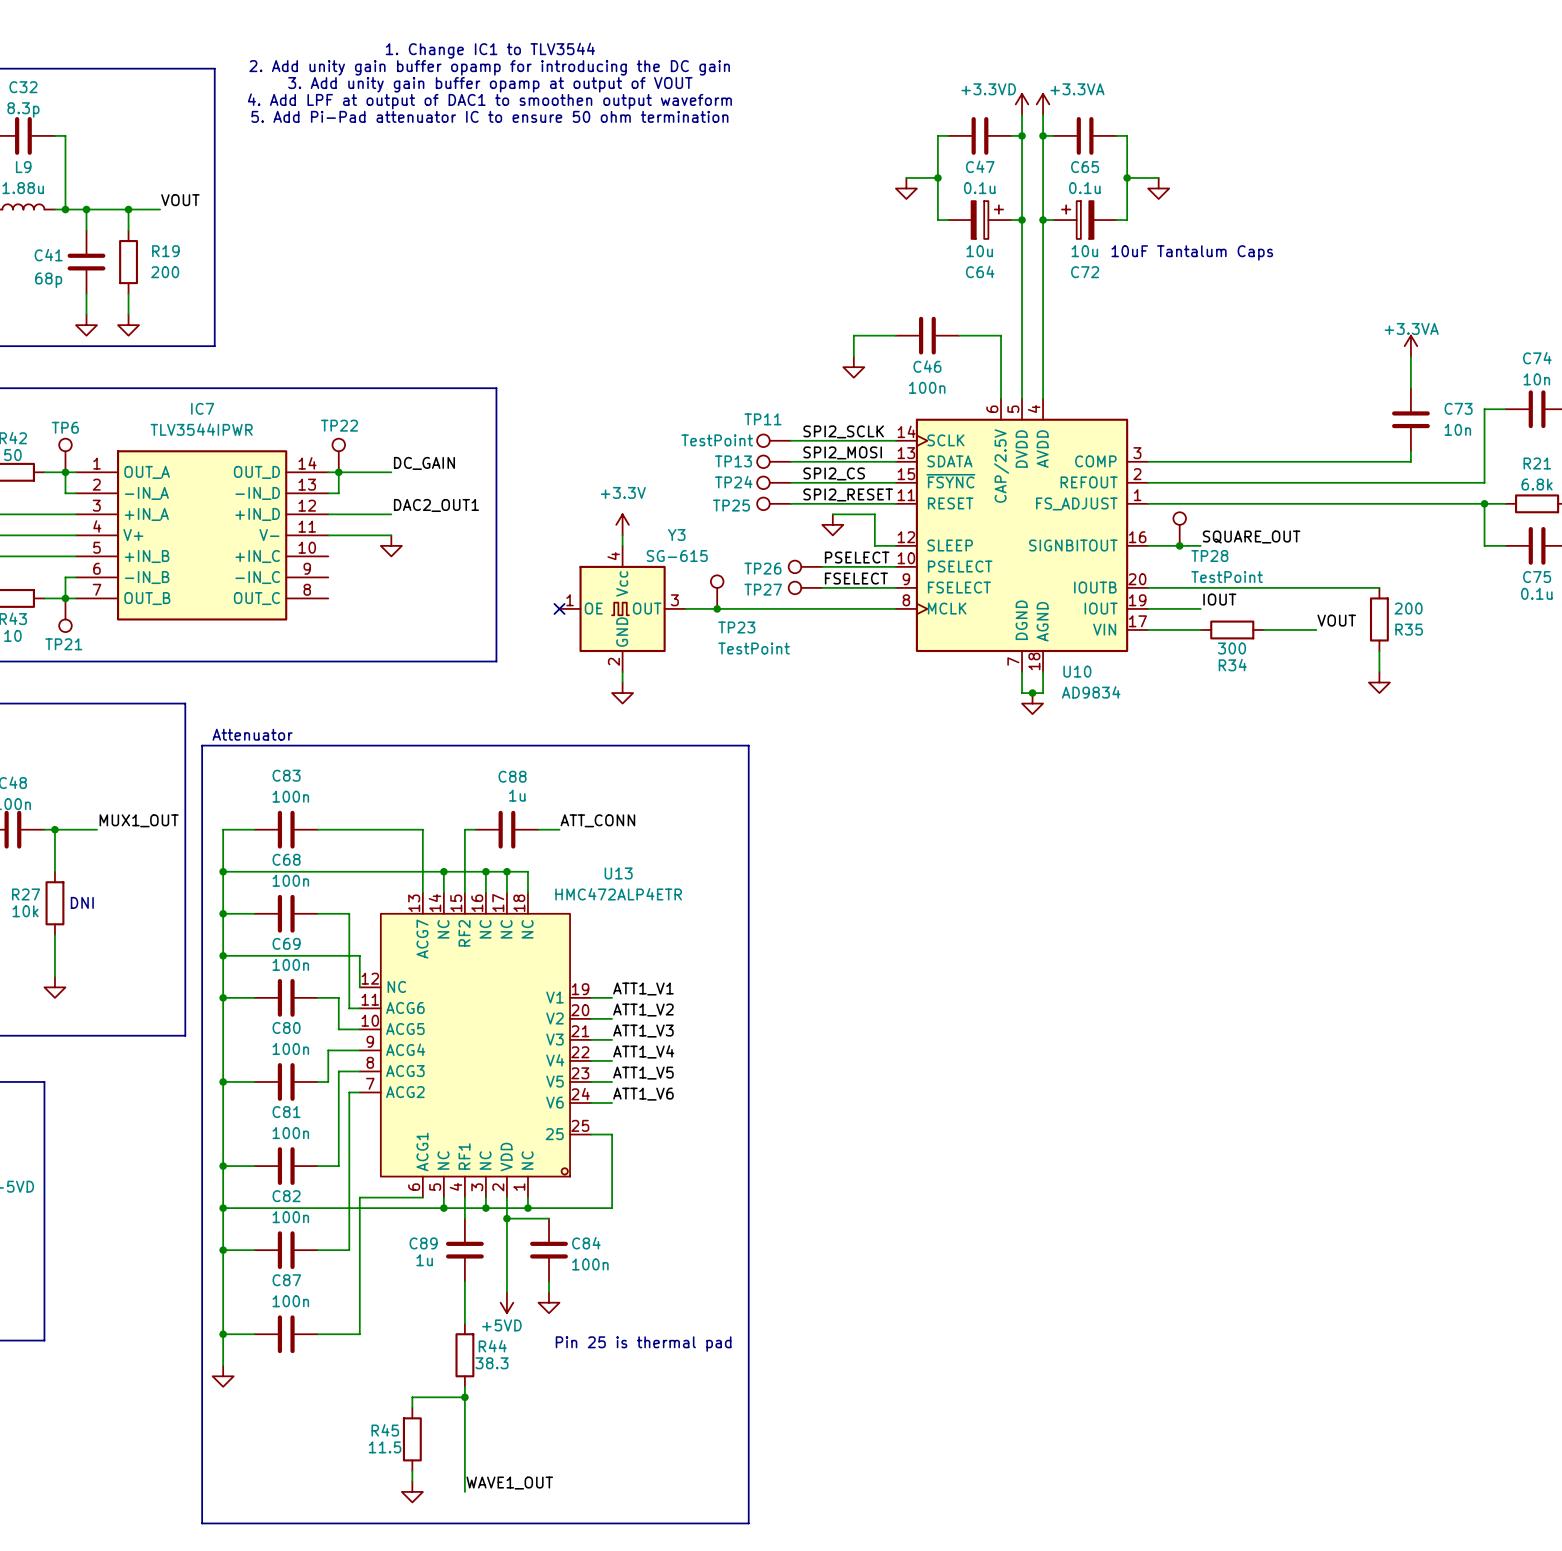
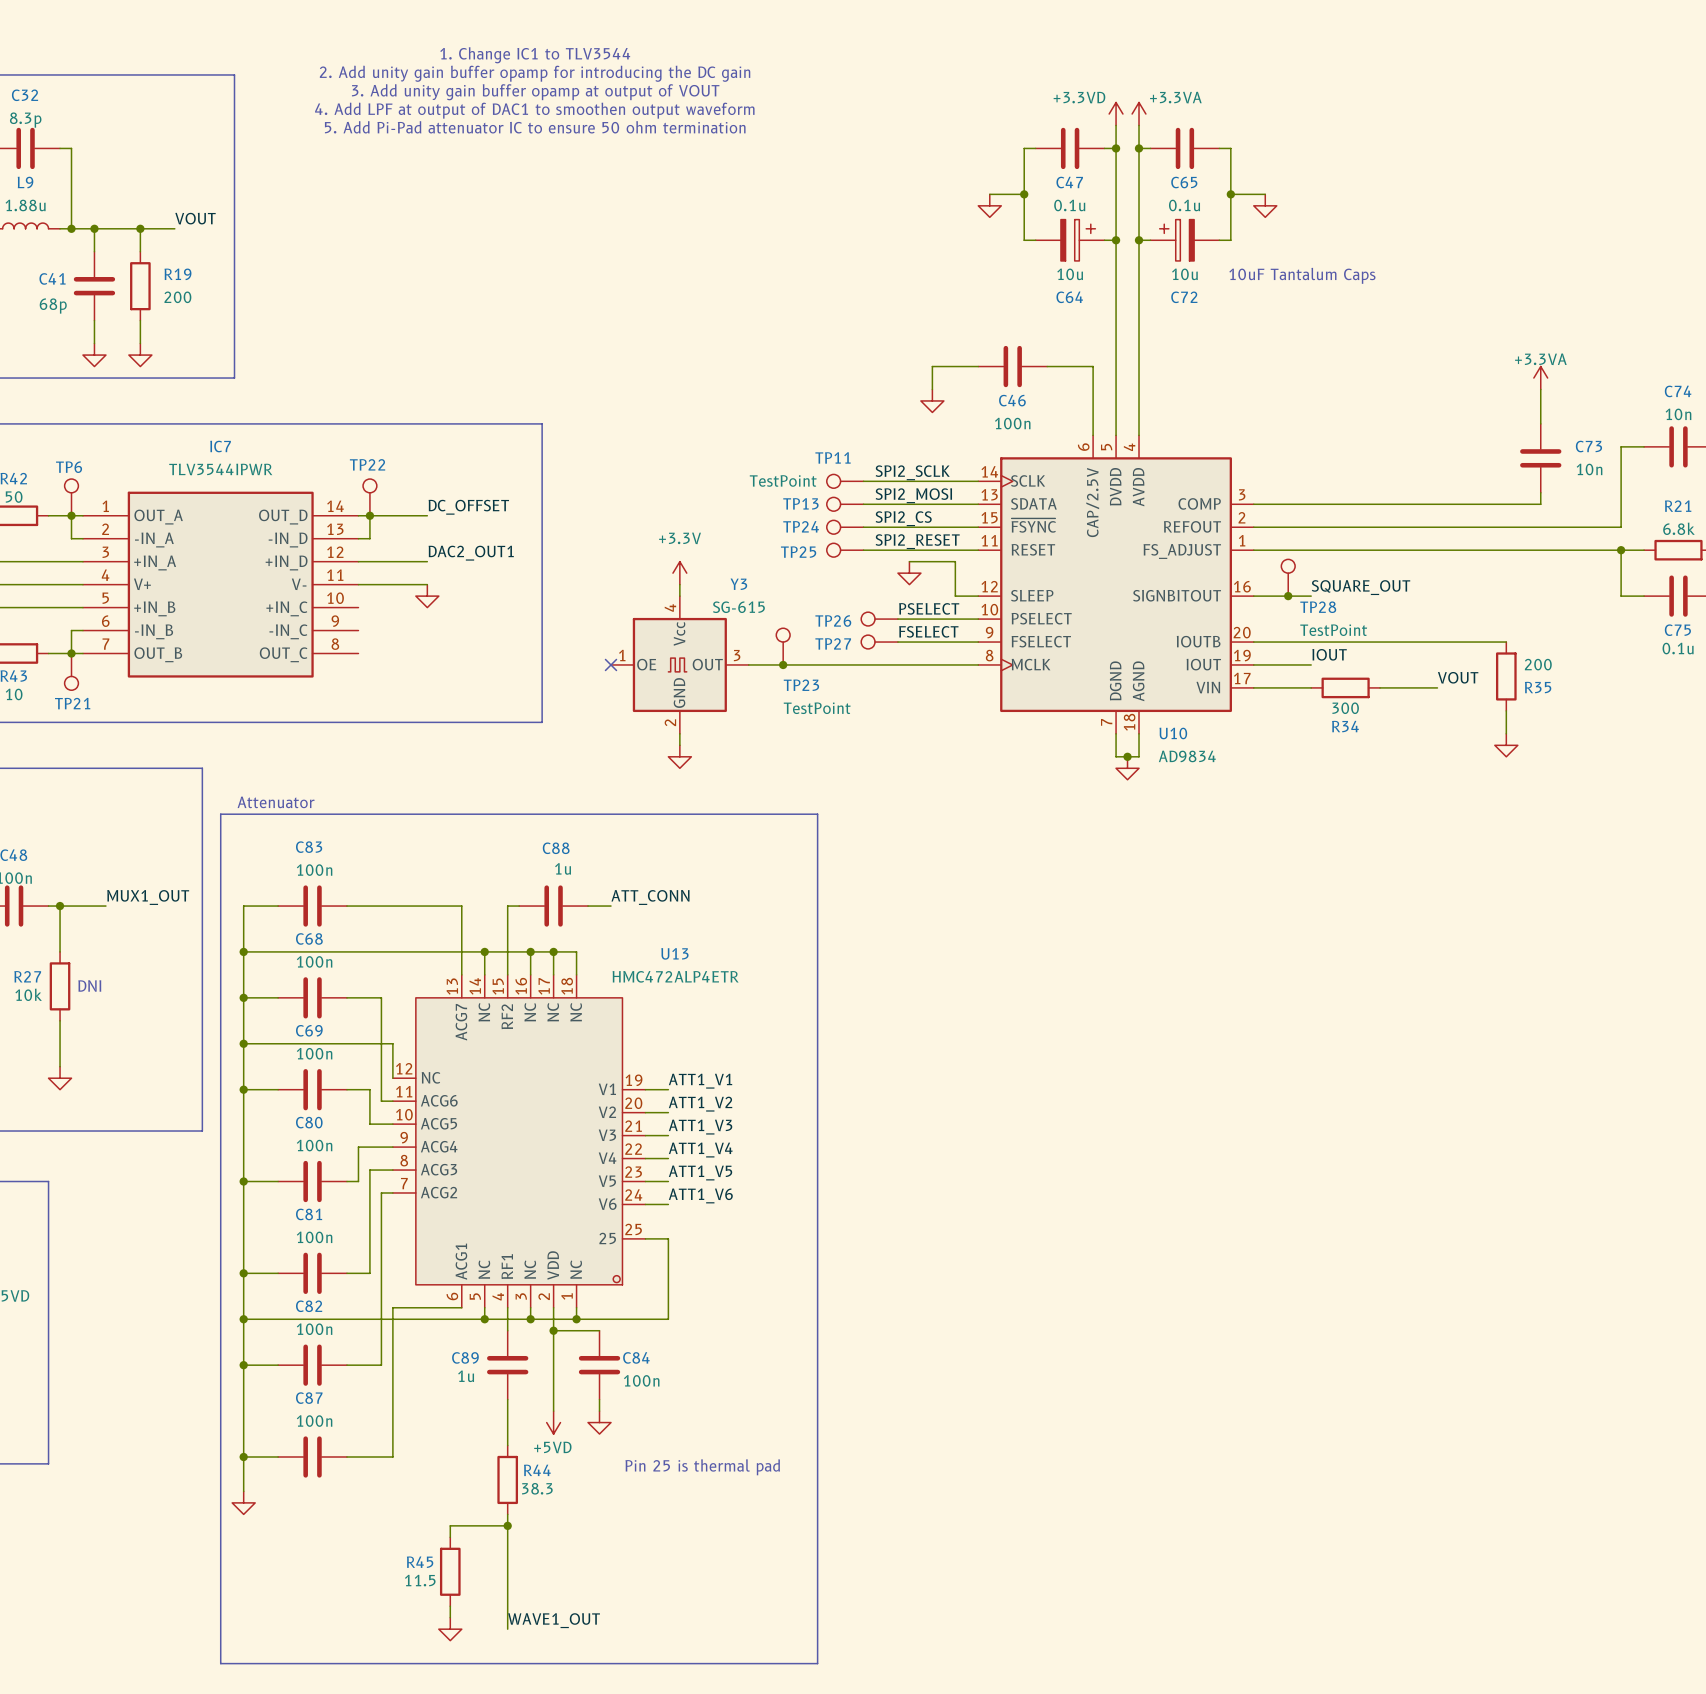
label: DC_GAIN (424, 463) -> DC_OFFSET (468, 507)

